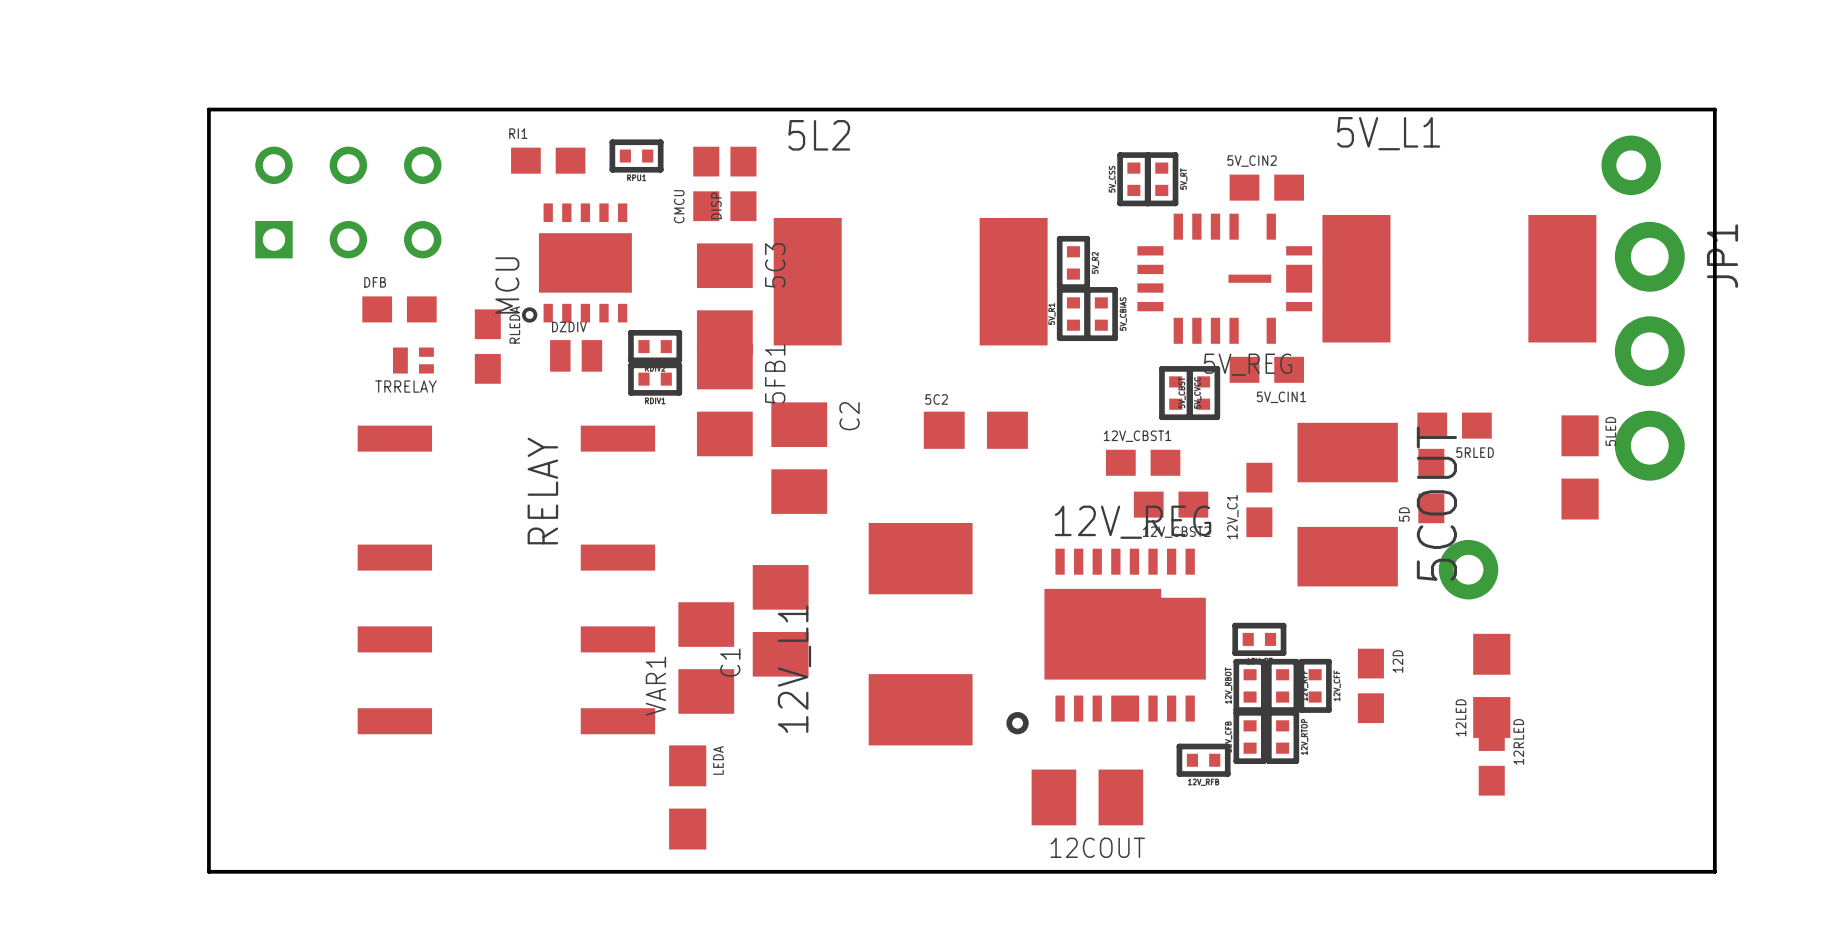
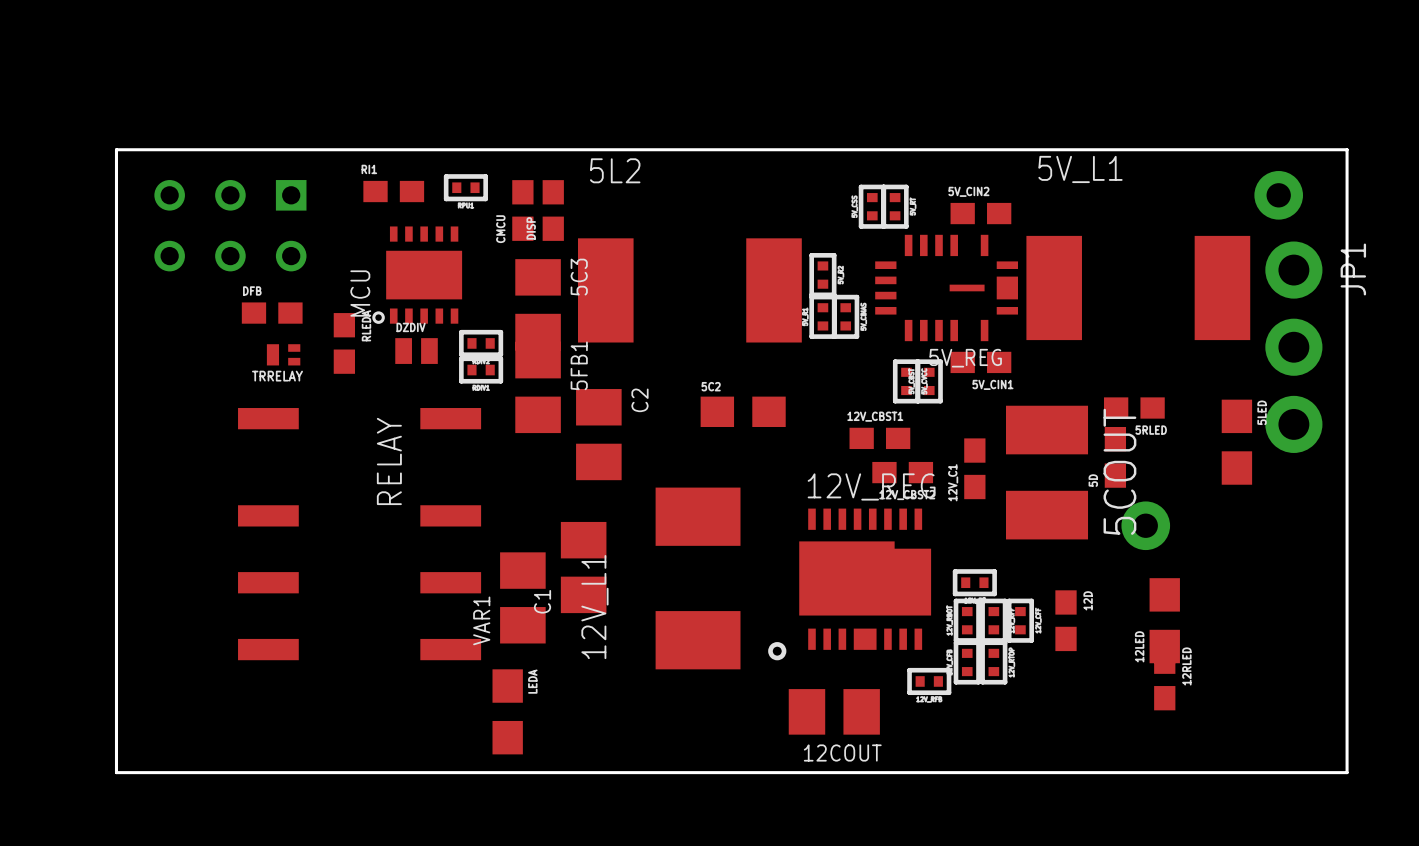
part rotation: 0° (348, 202) -> 180° (230, 225)

